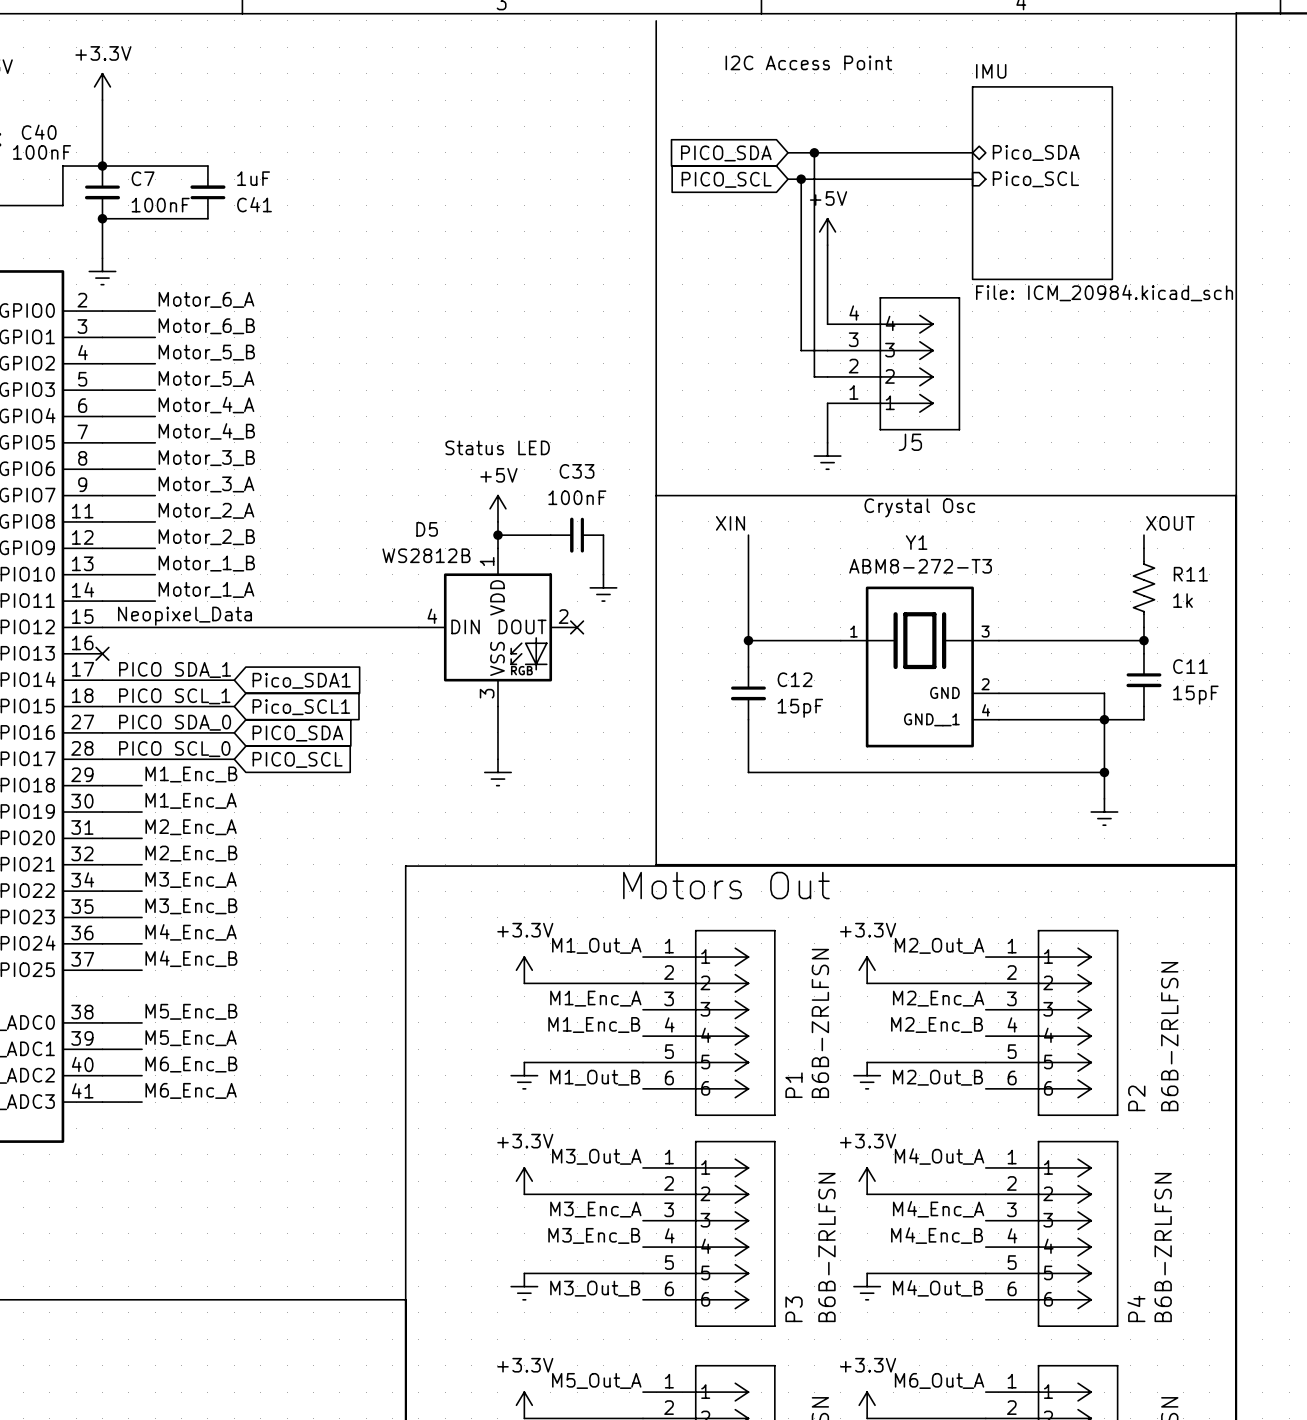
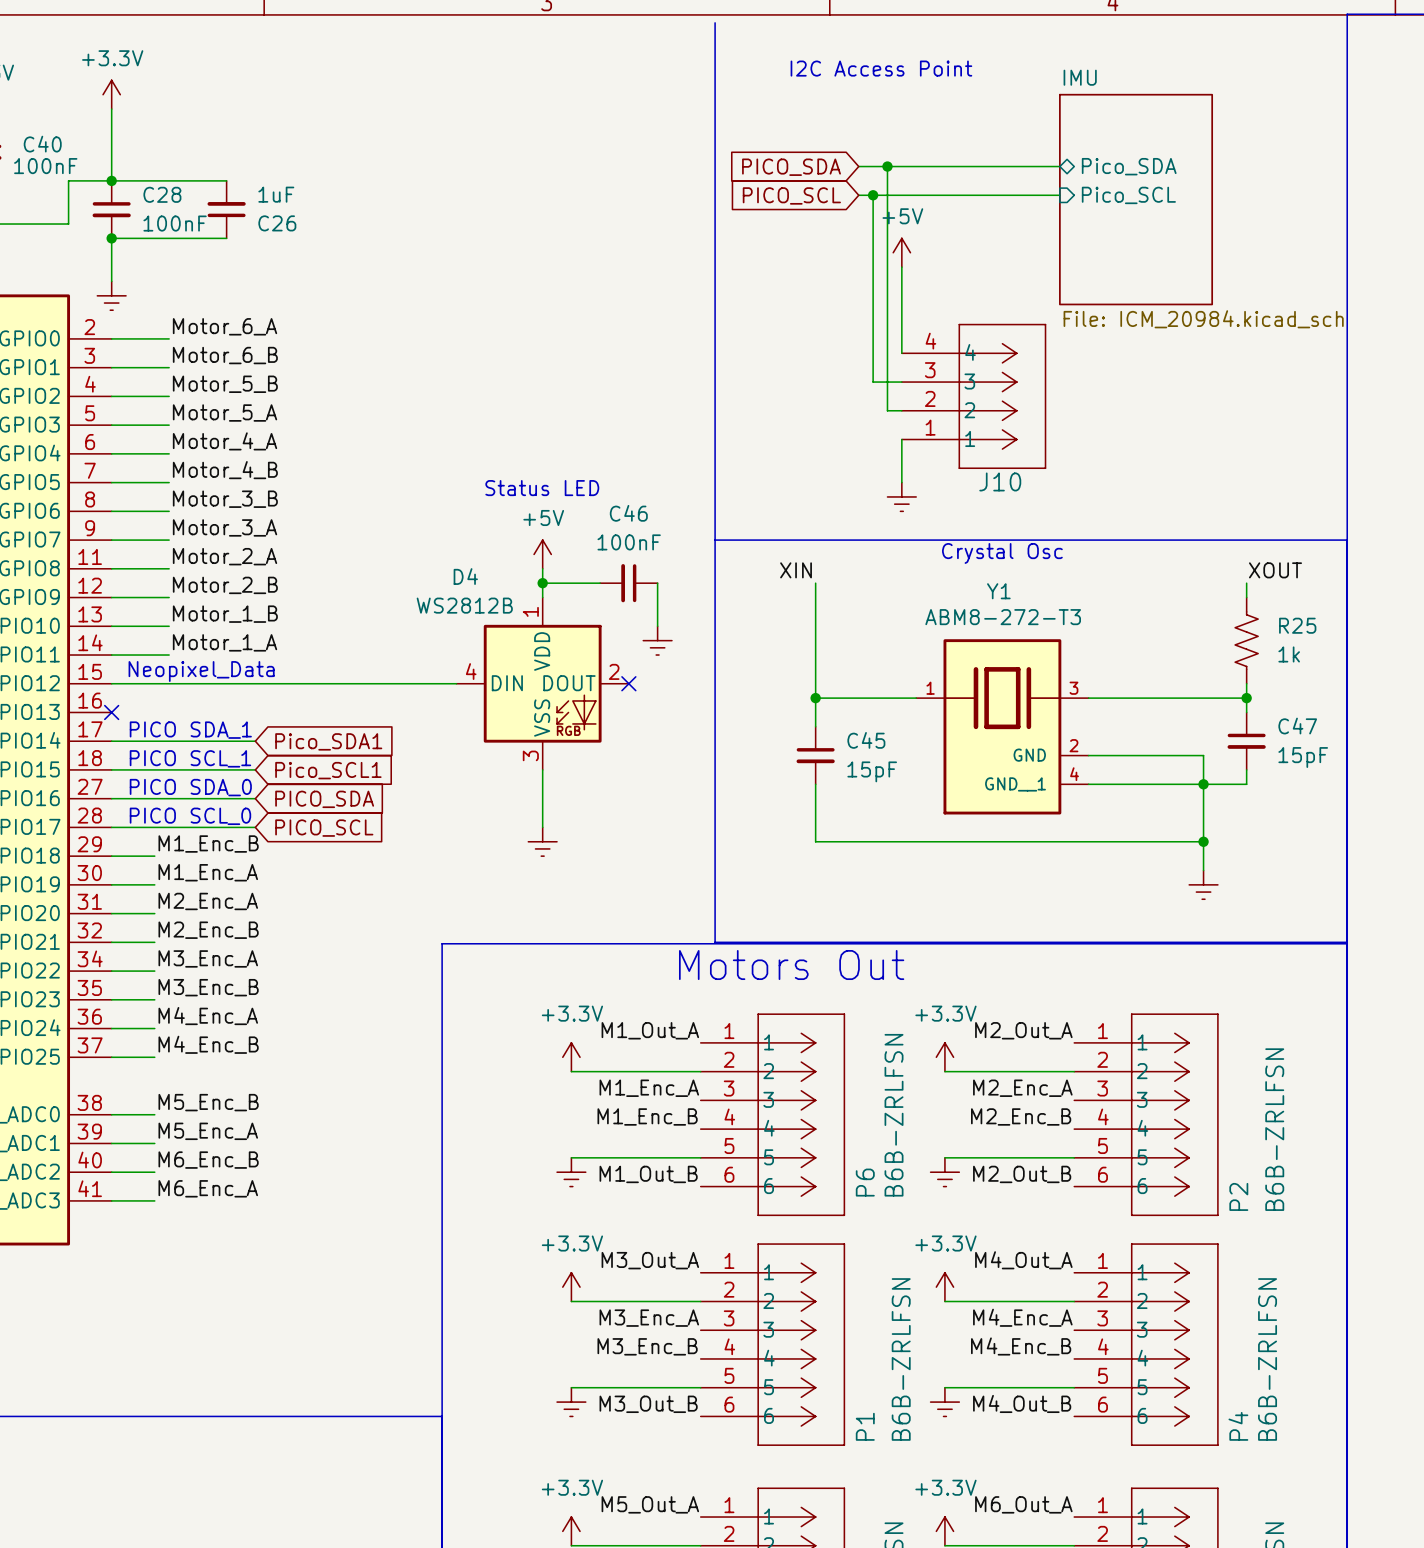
C7 name: C7 (143, 178) -> C28 (162, 194)
C41 name: C41 (254, 204) -> C26 (277, 223)
J5 name: J5 (910, 442) -> J10 (1000, 481)
C33 name: C33 (577, 471) -> C46 (628, 513)
D5 name: D5 (427, 529) -> D4 (465, 576)
R11 name: R11 (1190, 574) -> R25 (1297, 625)
C11 name: C11 (1190, 666) -> C47 (1297, 726)
C12 name: C12 (795, 679) -> C45 (866, 740)
P1 name: P1 (794, 1085) -> P6 (865, 1182)
P3 name: P3 (794, 1309) -> P1 (865, 1426)

